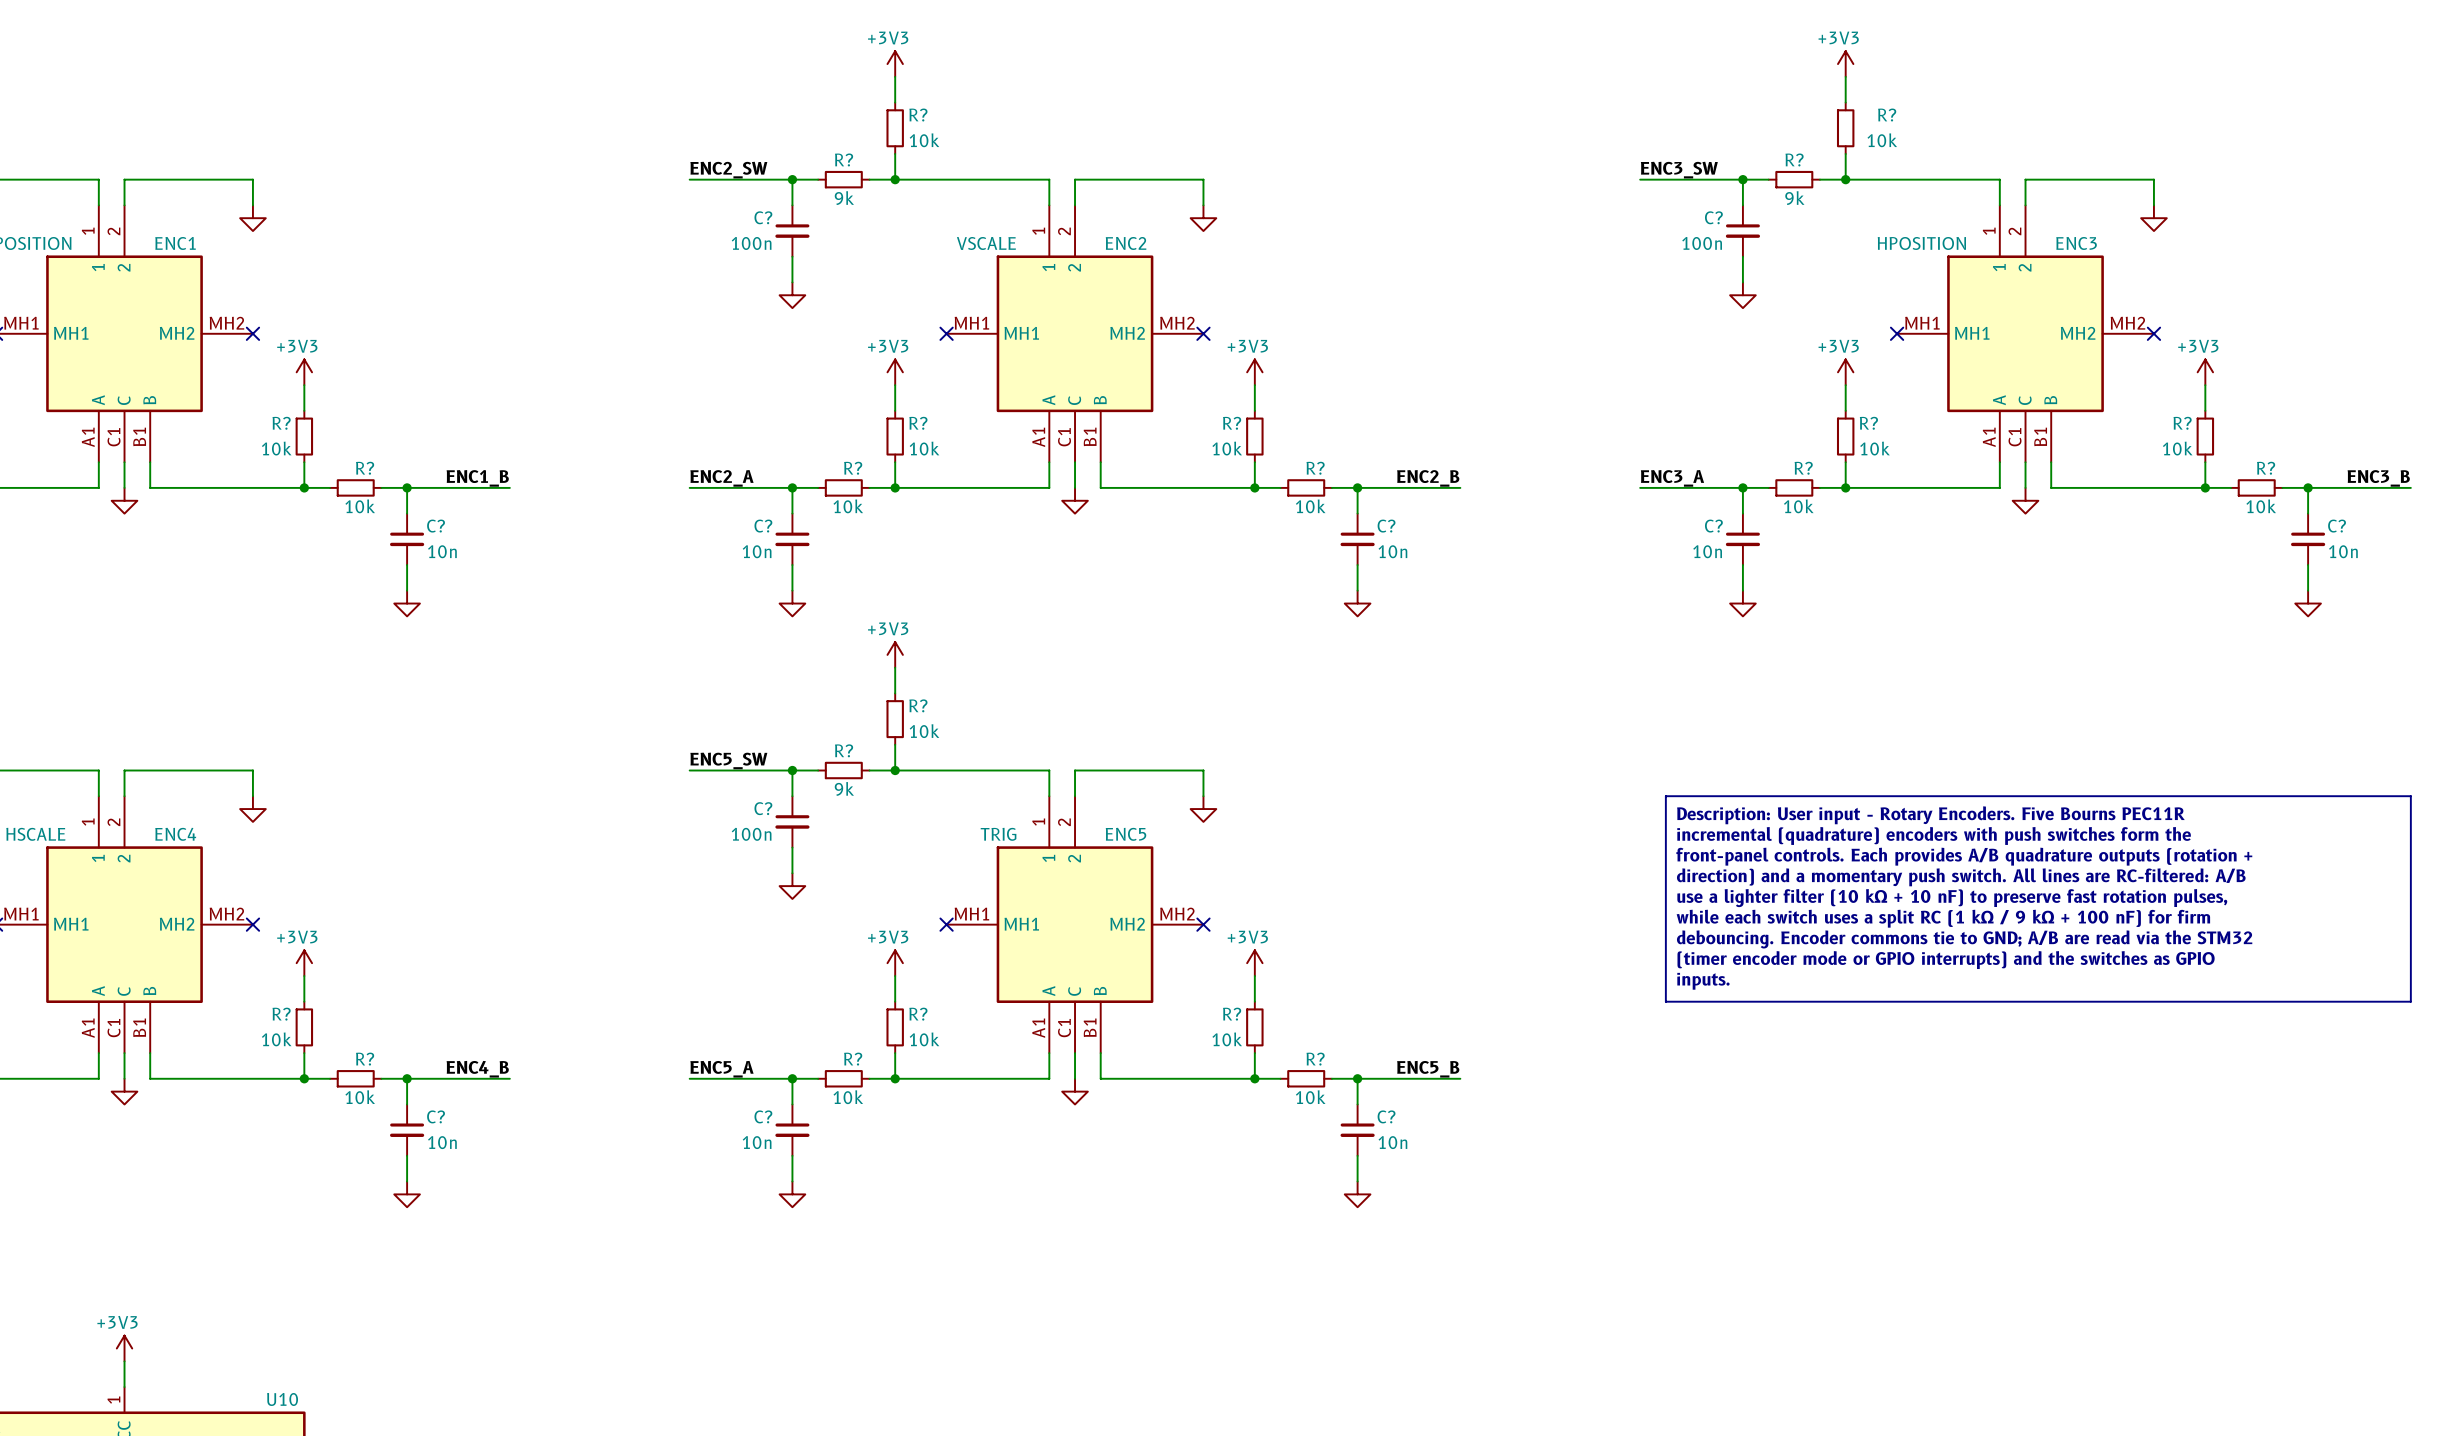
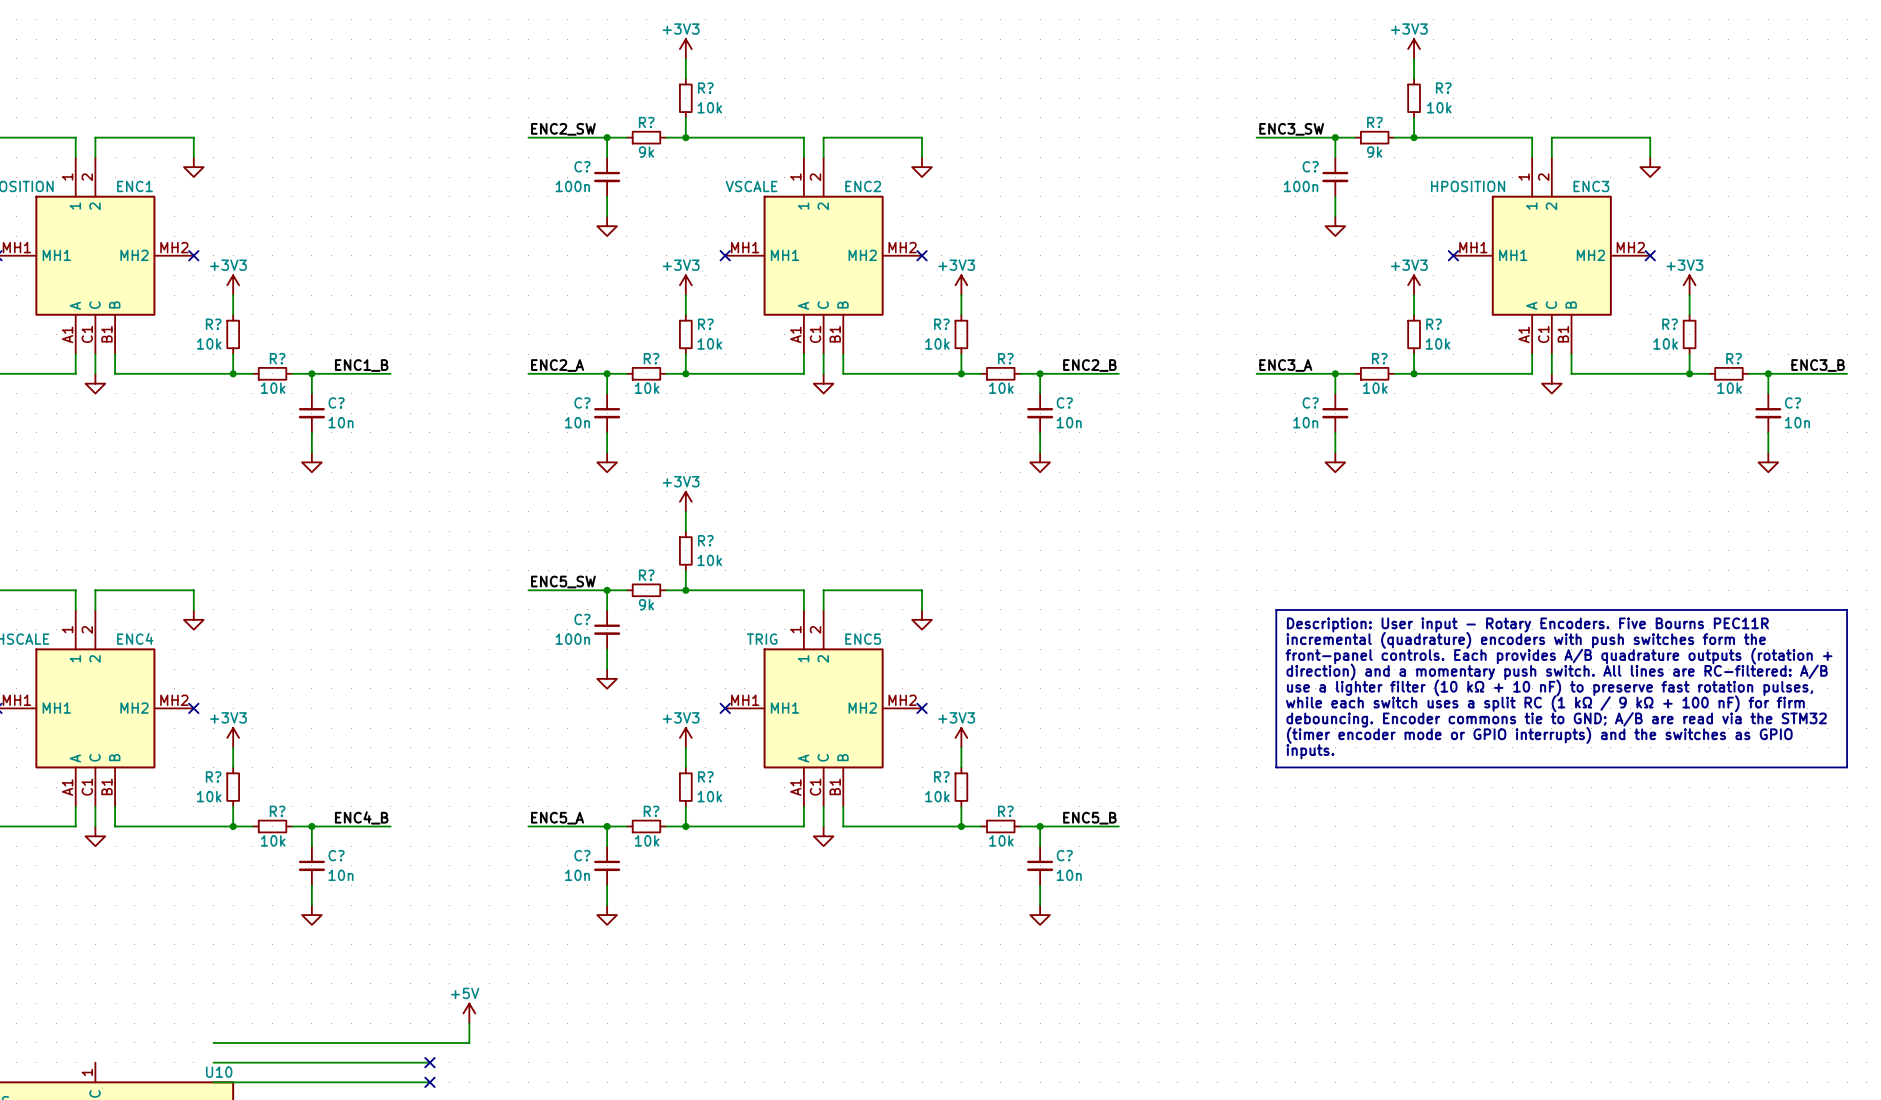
power symbol: none -> +5V (469, 1013)
wire: none -> (469, 1023) (469, 1042) (213, 1042)
power symbol: +3V3 (124, 1348) -> none
wire: (124, 1361) (124, 1387) -> none
wire: none -> (213, 1062) (429, 1062)
no-connect mark: none -> (429, 1062)
wire: none -> (213, 1082) (429, 1082)
no-connect mark: none -> (429, 1082)

